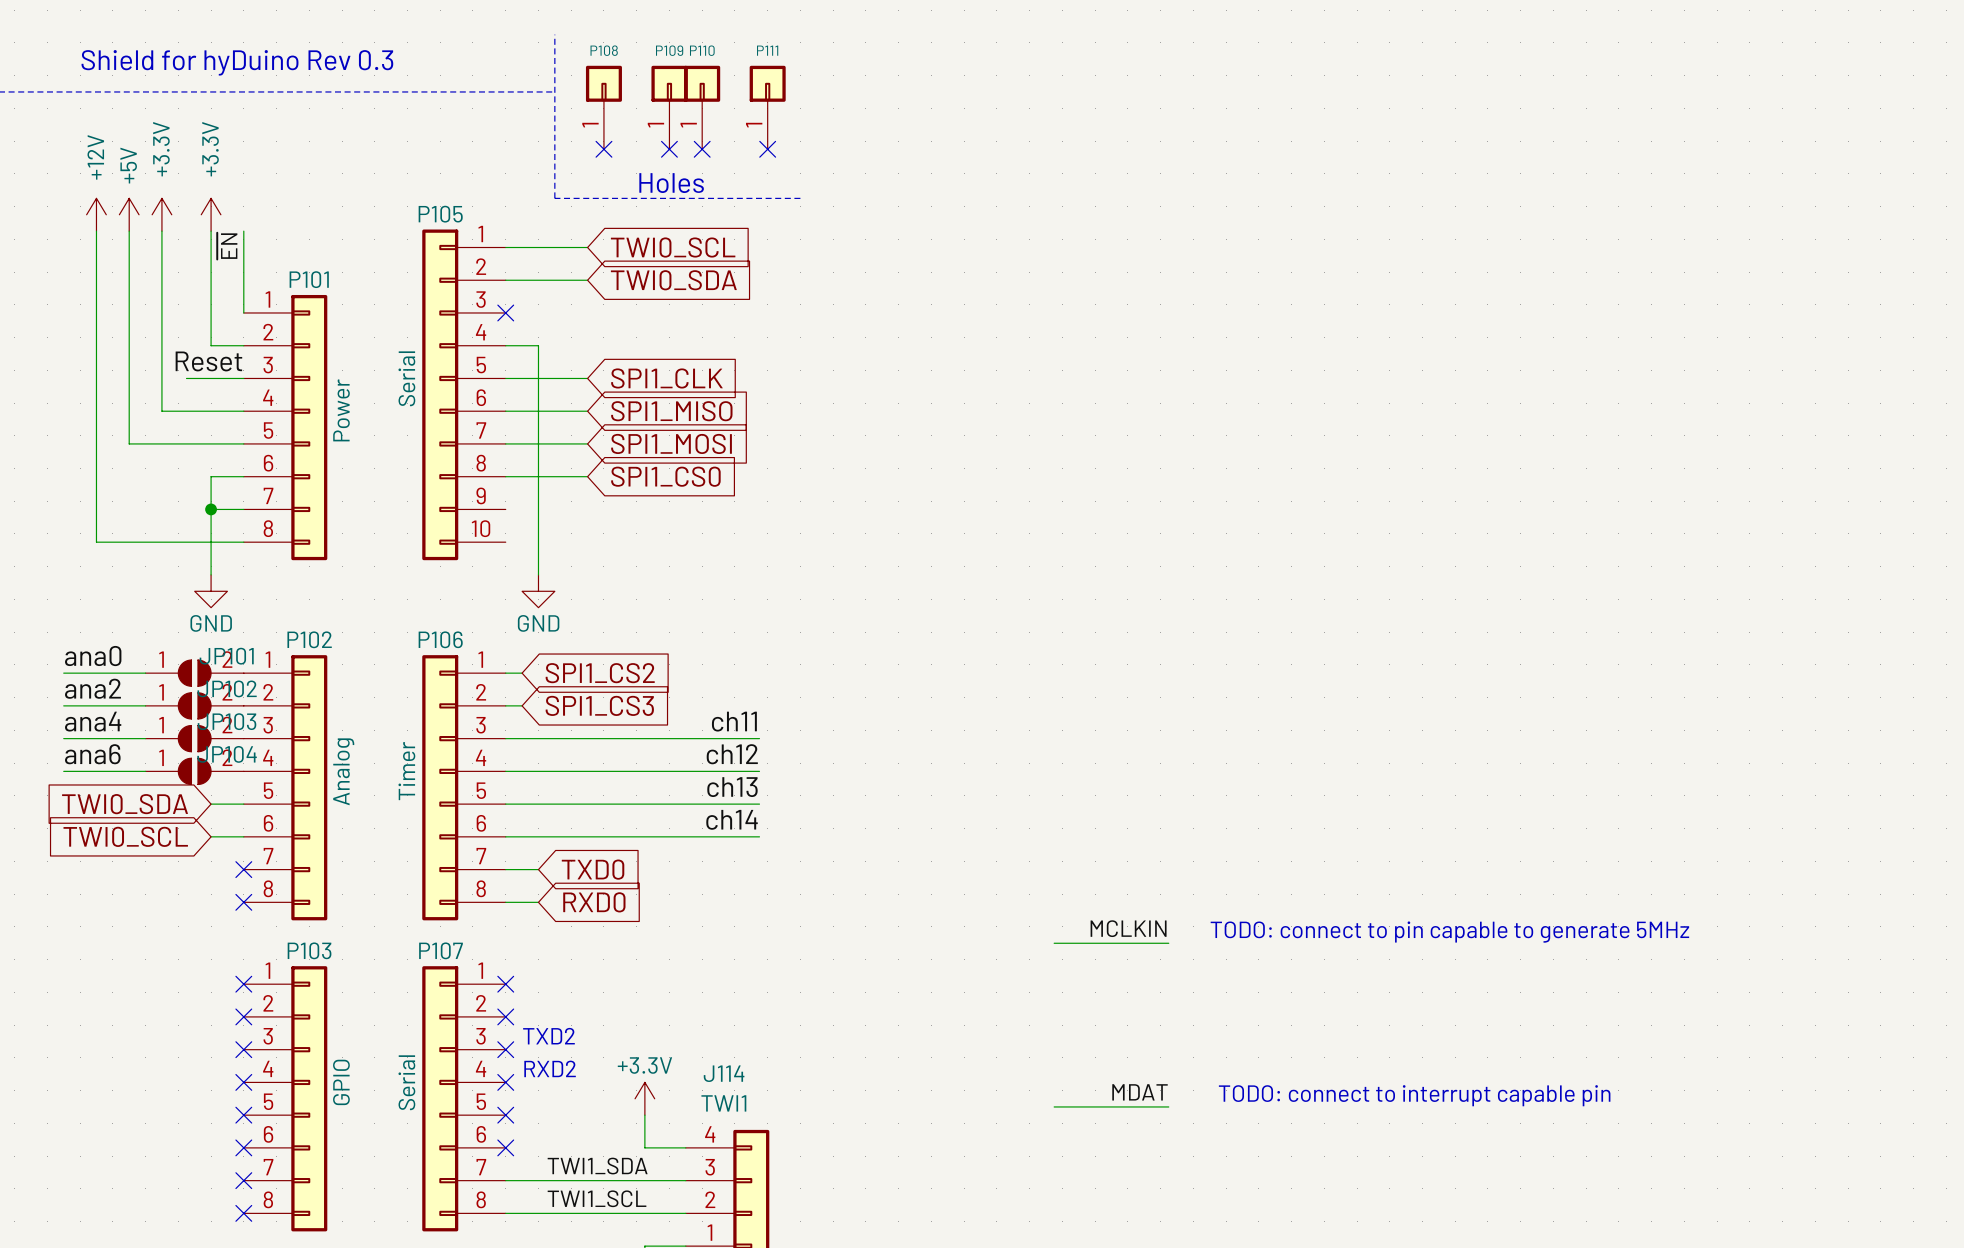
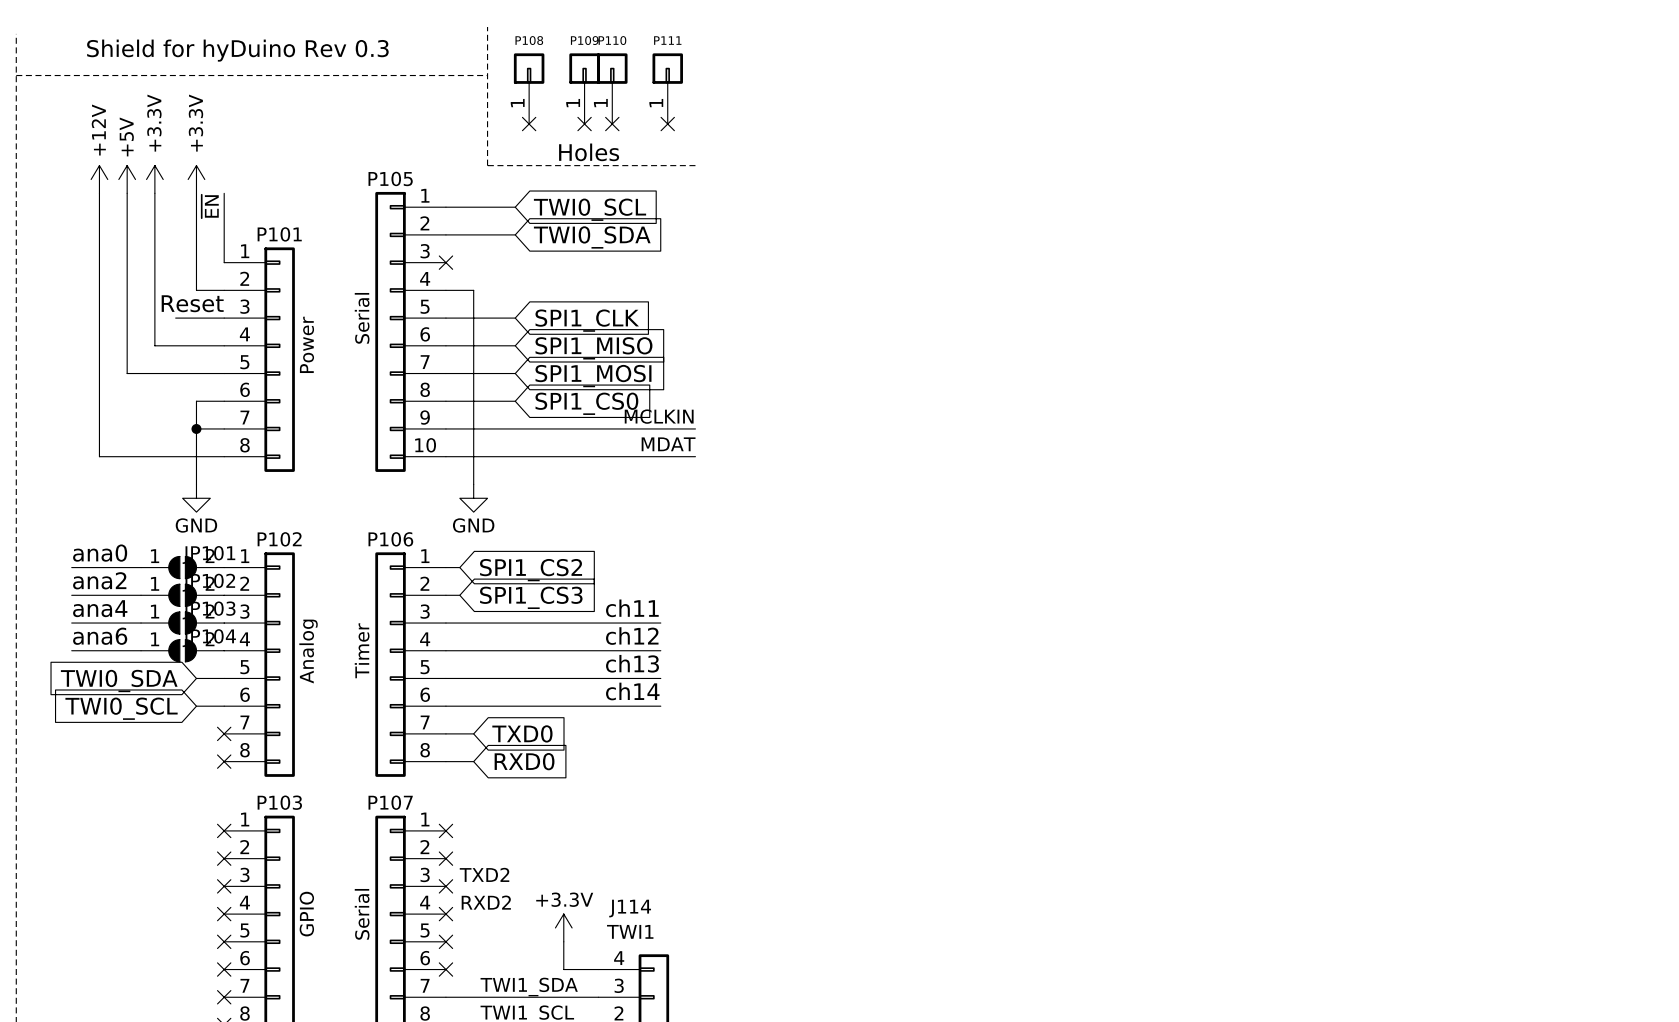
label: none -> MCLKIN (659, 416)
wire: none -> (445, 428) (695, 428)
label: none -> MDAT (668, 444)
wire: none -> (445, 456) (695, 456)
label: MCLKIN (1128, 928) -> none
text: TODO: connect to pin capable to generate 5MHz (1449, 932) -> none
wire: (1054, 943) (1168, 943) -> none
label: MDAT (1140, 1092) -> none
text: TODO: connect to interrupt capable pin (1414, 1095) -> none
wire: (1054, 1106) (1168, 1106) -> none

